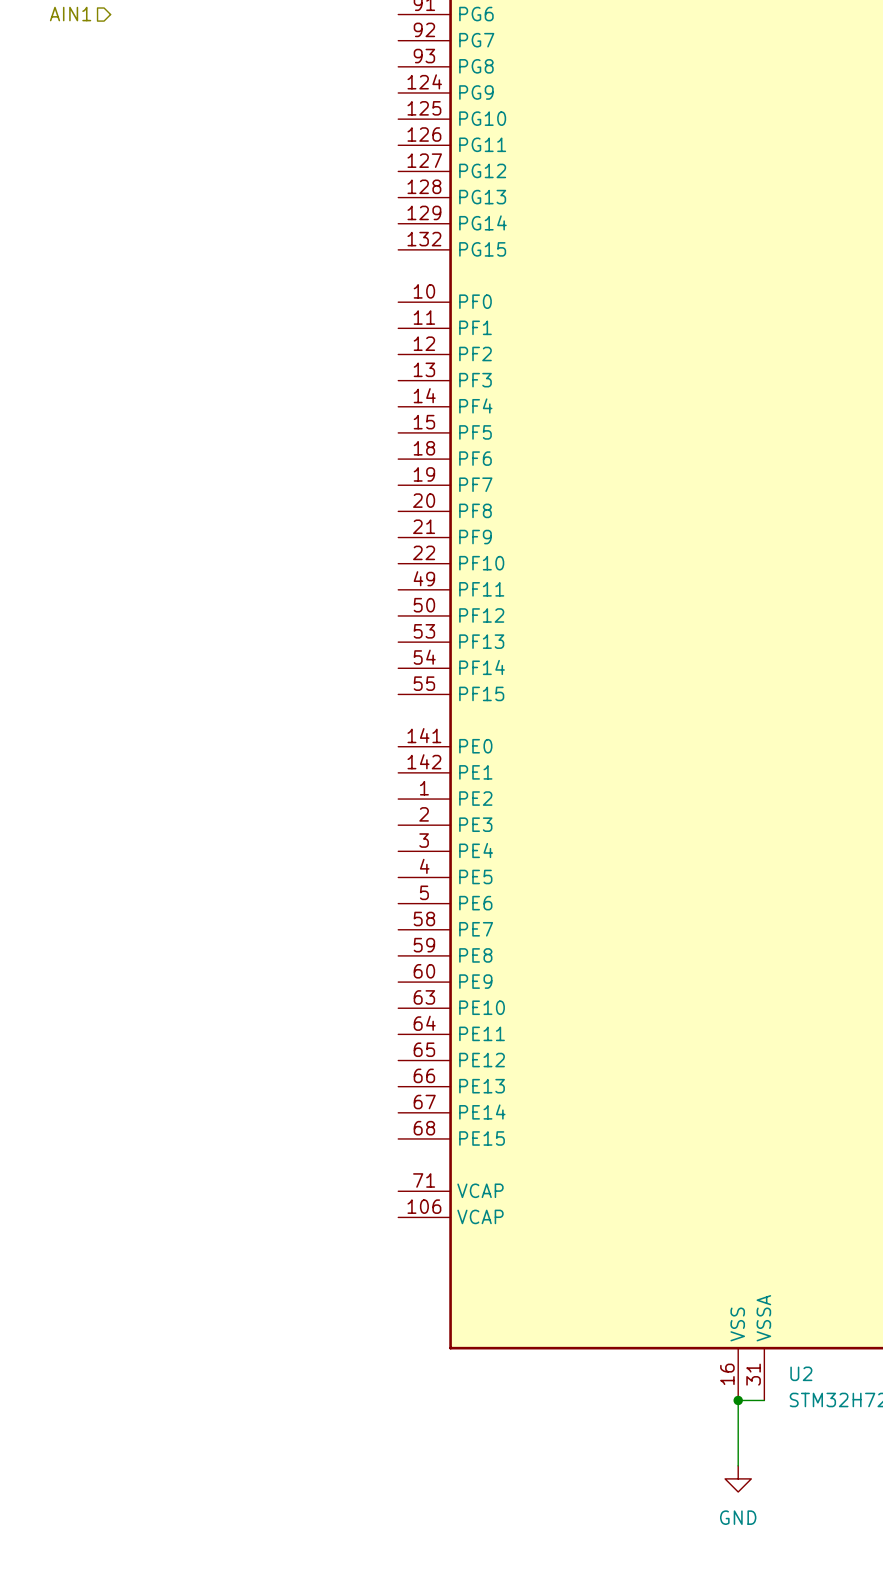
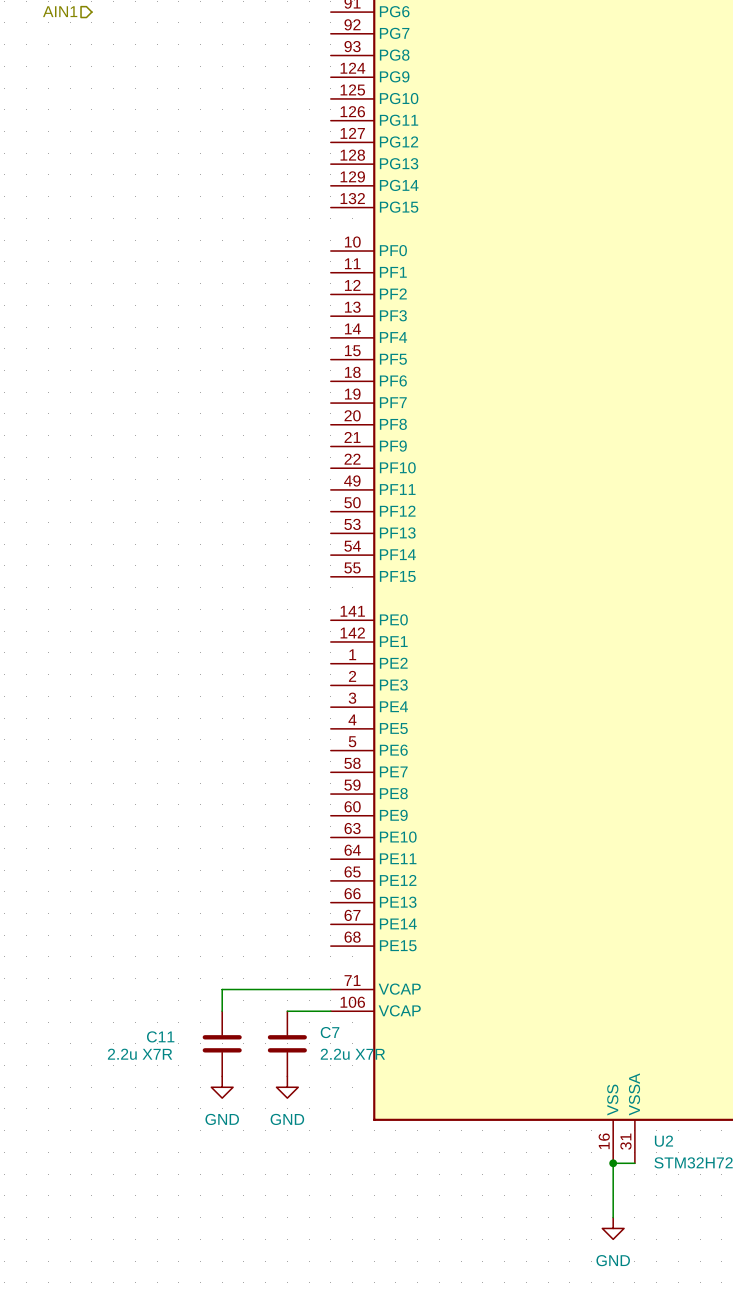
wire: none -> (330, 989) (222, 989) (222, 1011)
wire: none -> (287, 1011) (330, 1011)
C11: none -> 2.2u X7R (222, 1043)
C7: none -> 2.2u X7R (287, 1043)
power symbol: none -> GND (222, 1087)
power symbol: none -> GND (287, 1087)

